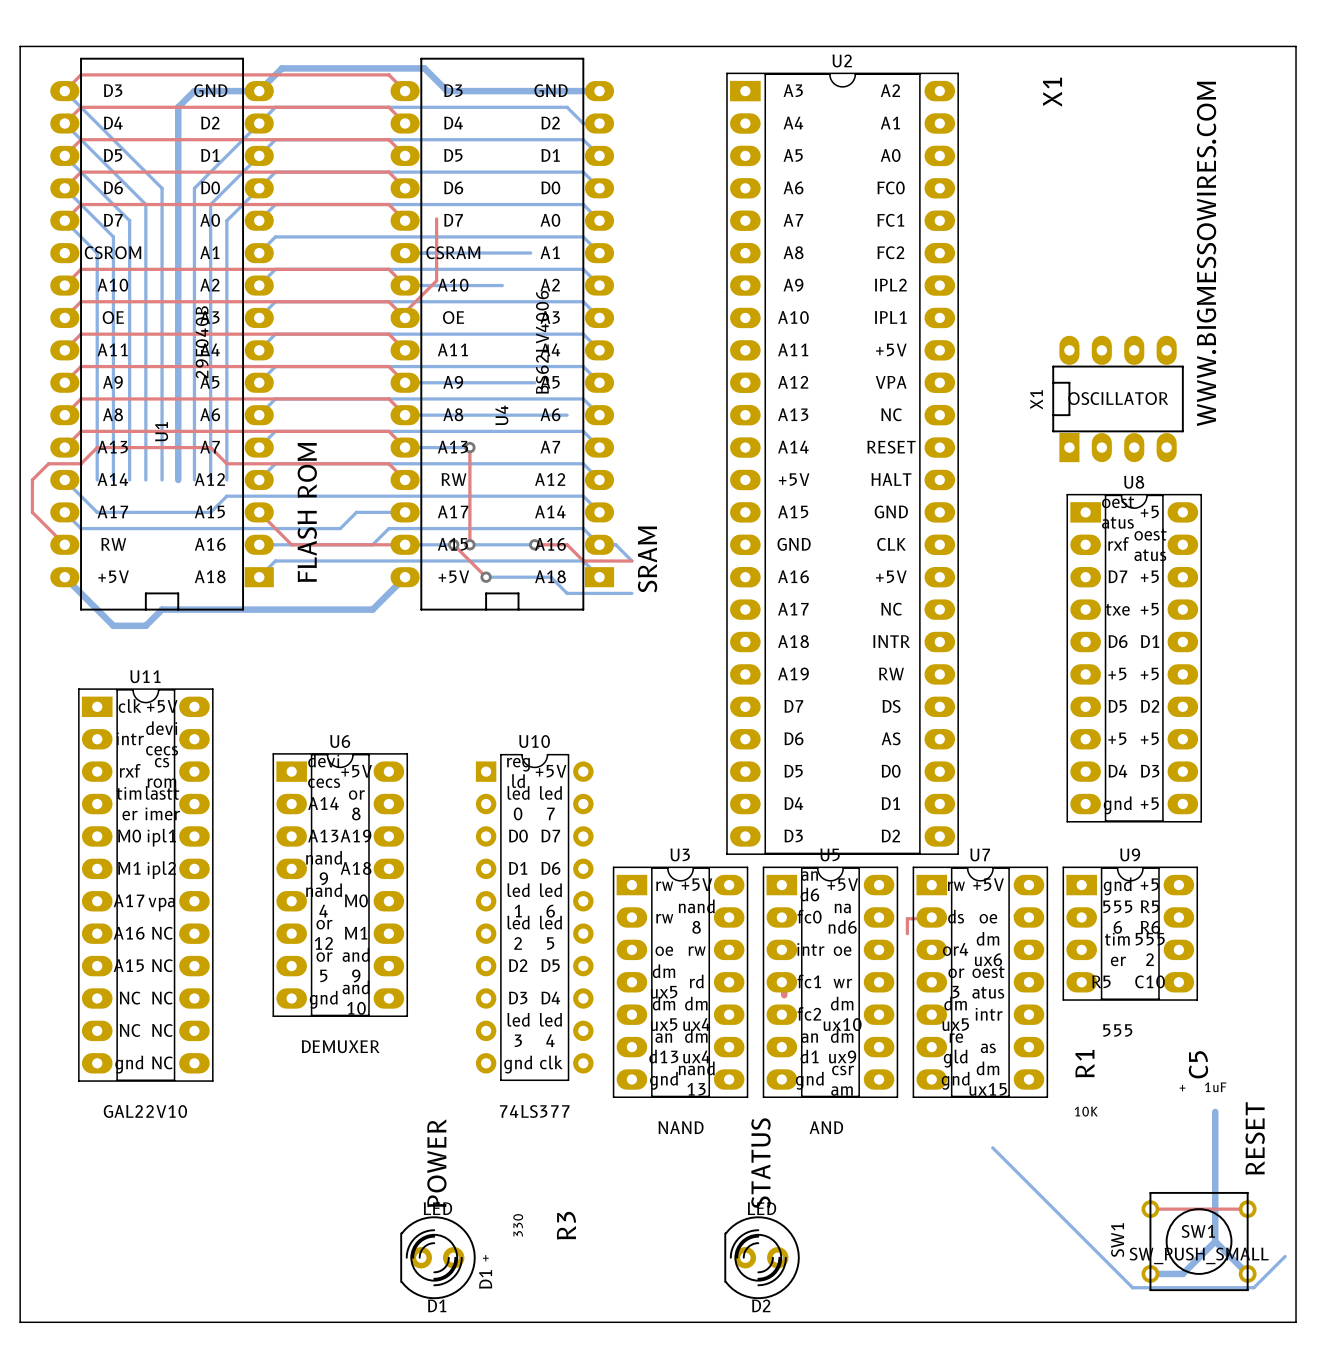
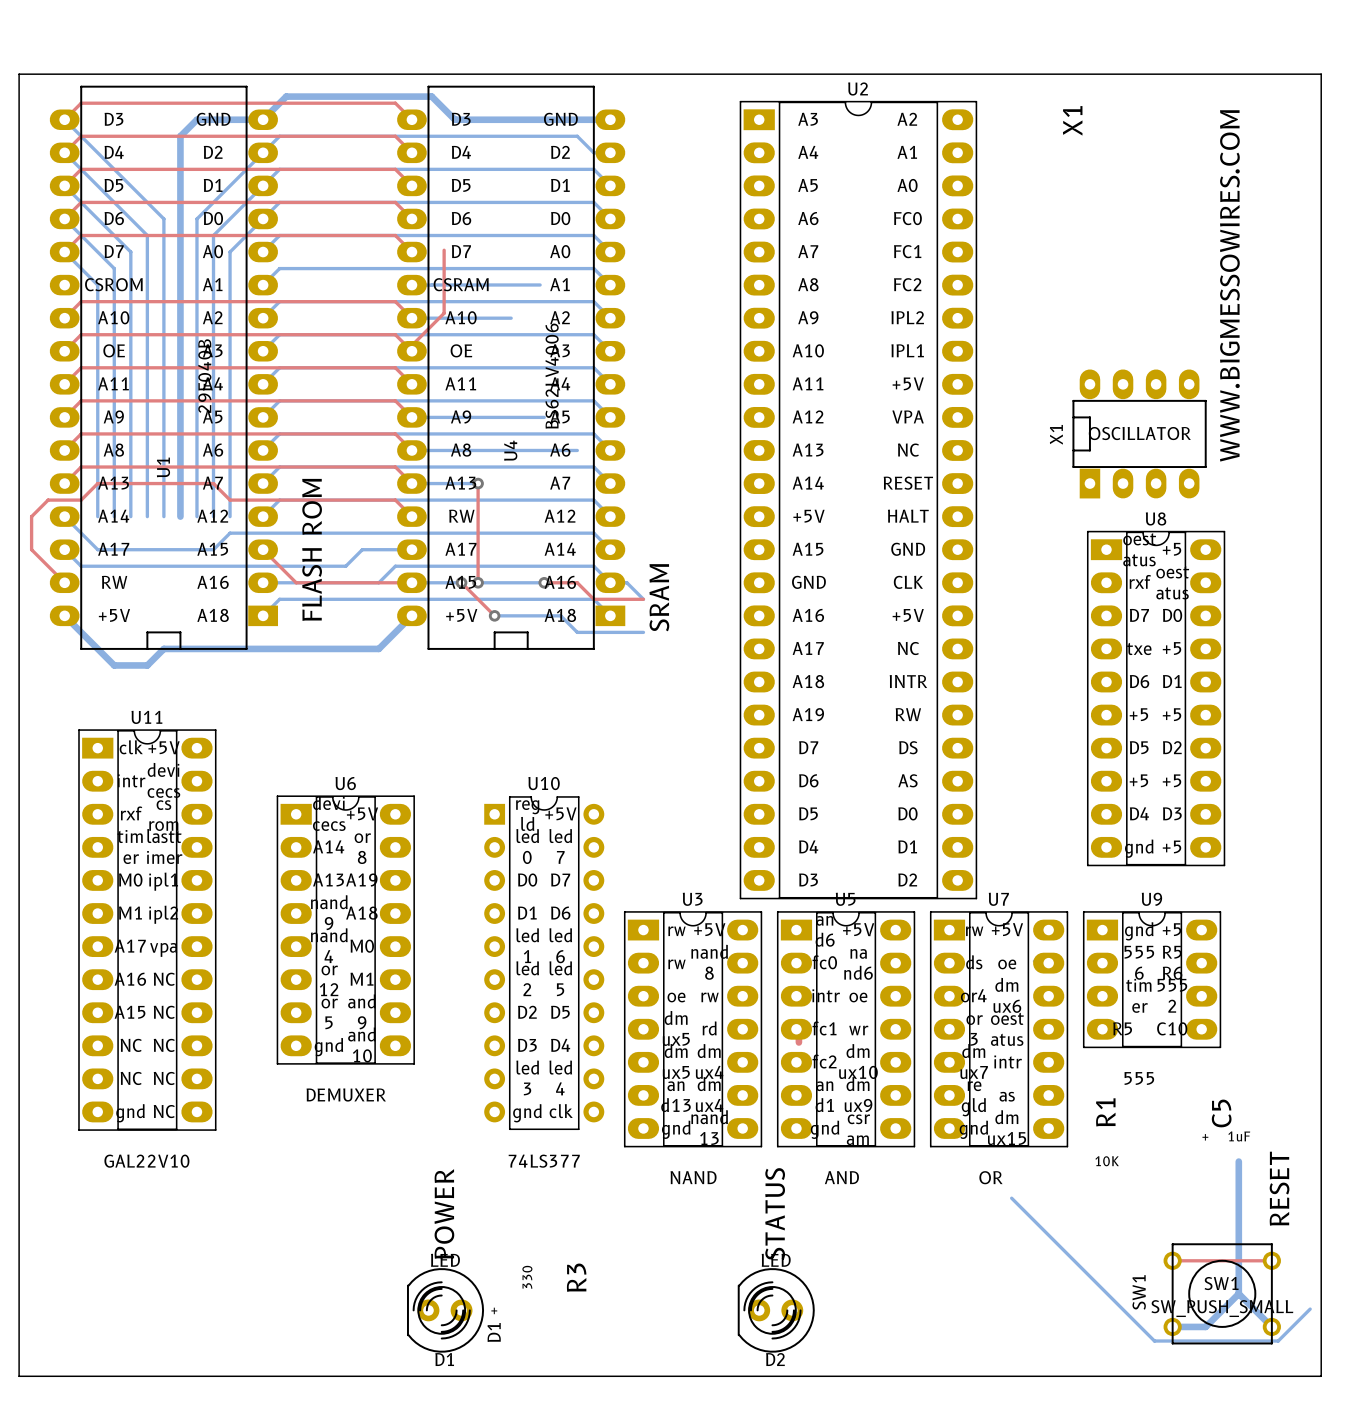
text: +5 (1149, 576) -> D0 (1172, 615)
top track: (915, 918) (907, 918) (907, 933) -> none
text: ux5 (955, 1024) -> ux7 (974, 1072)
text: none -> OR (990, 1177)

